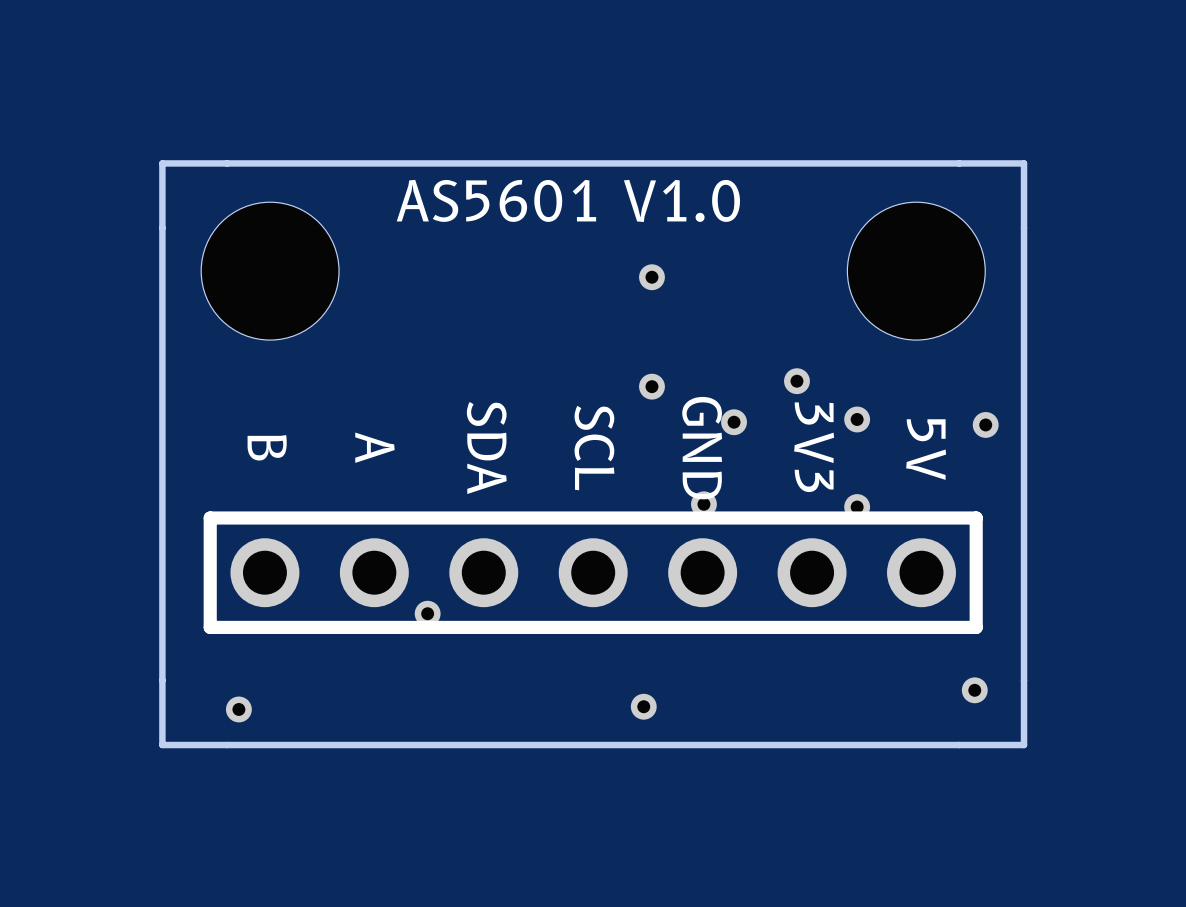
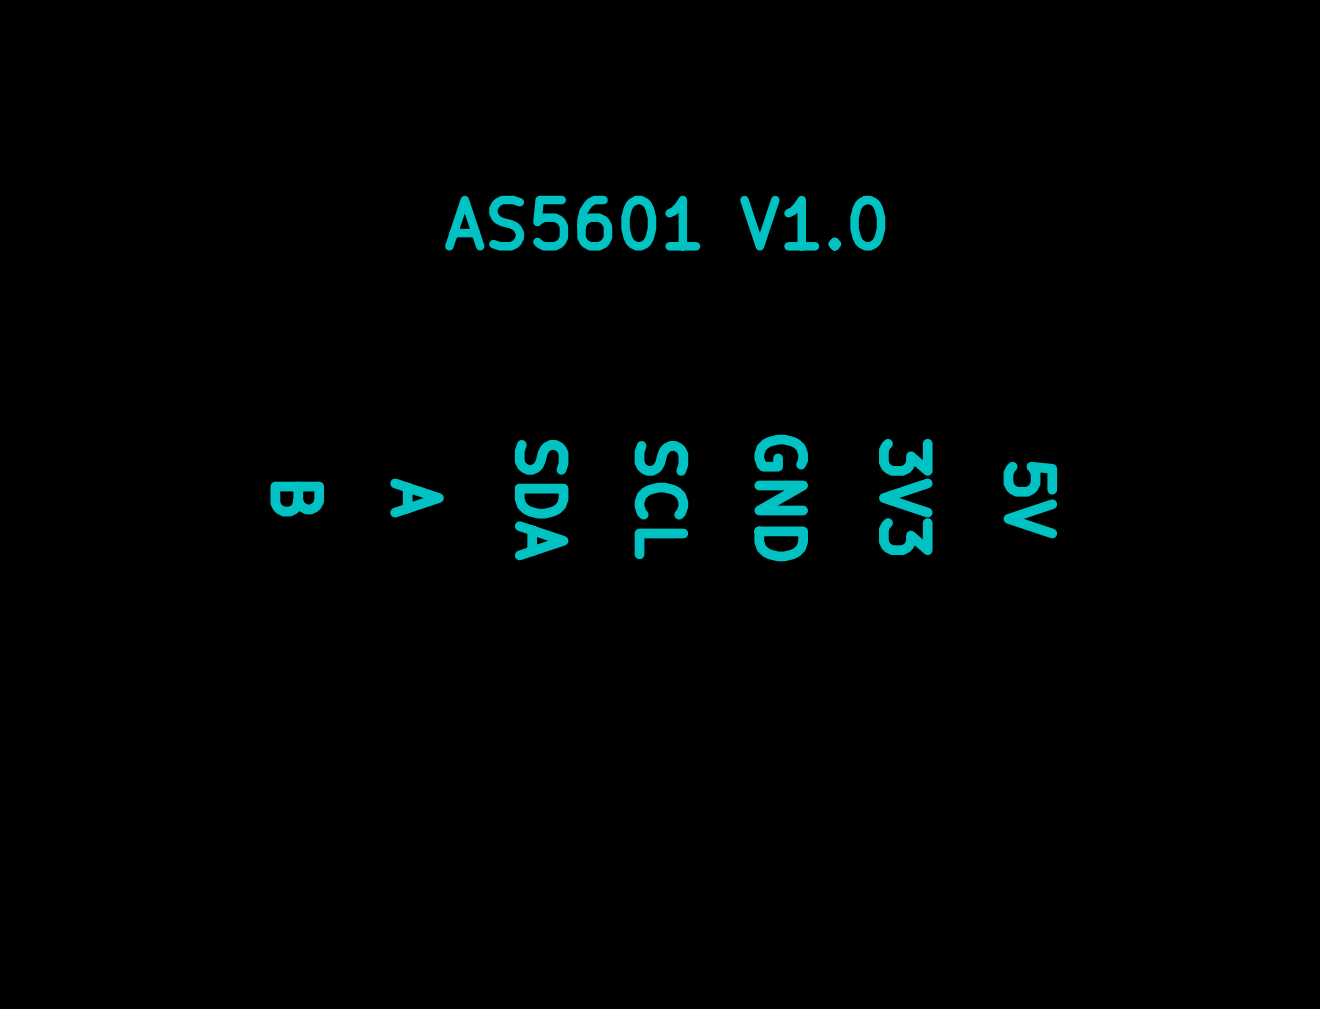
board edge: (1024, 163) (1024, 745) (162, 745) (162, 163) (1024, 163) -> none
part: (270, 271) -> none
part: (916, 271) -> none
part: (651, 277) -> none
part: (796, 381) -> none
part: (651, 386) -> none
part: (857, 419) -> none
part: (734, 422) -> none
part: (985, 424) -> none
part: (703, 504) -> none
part: (857, 507) -> none
part: (593, 572) -> none
part: (427, 613) -> none
part: (974, 690) -> none
part: (643, 706) -> none
part: (238, 709) -> none

